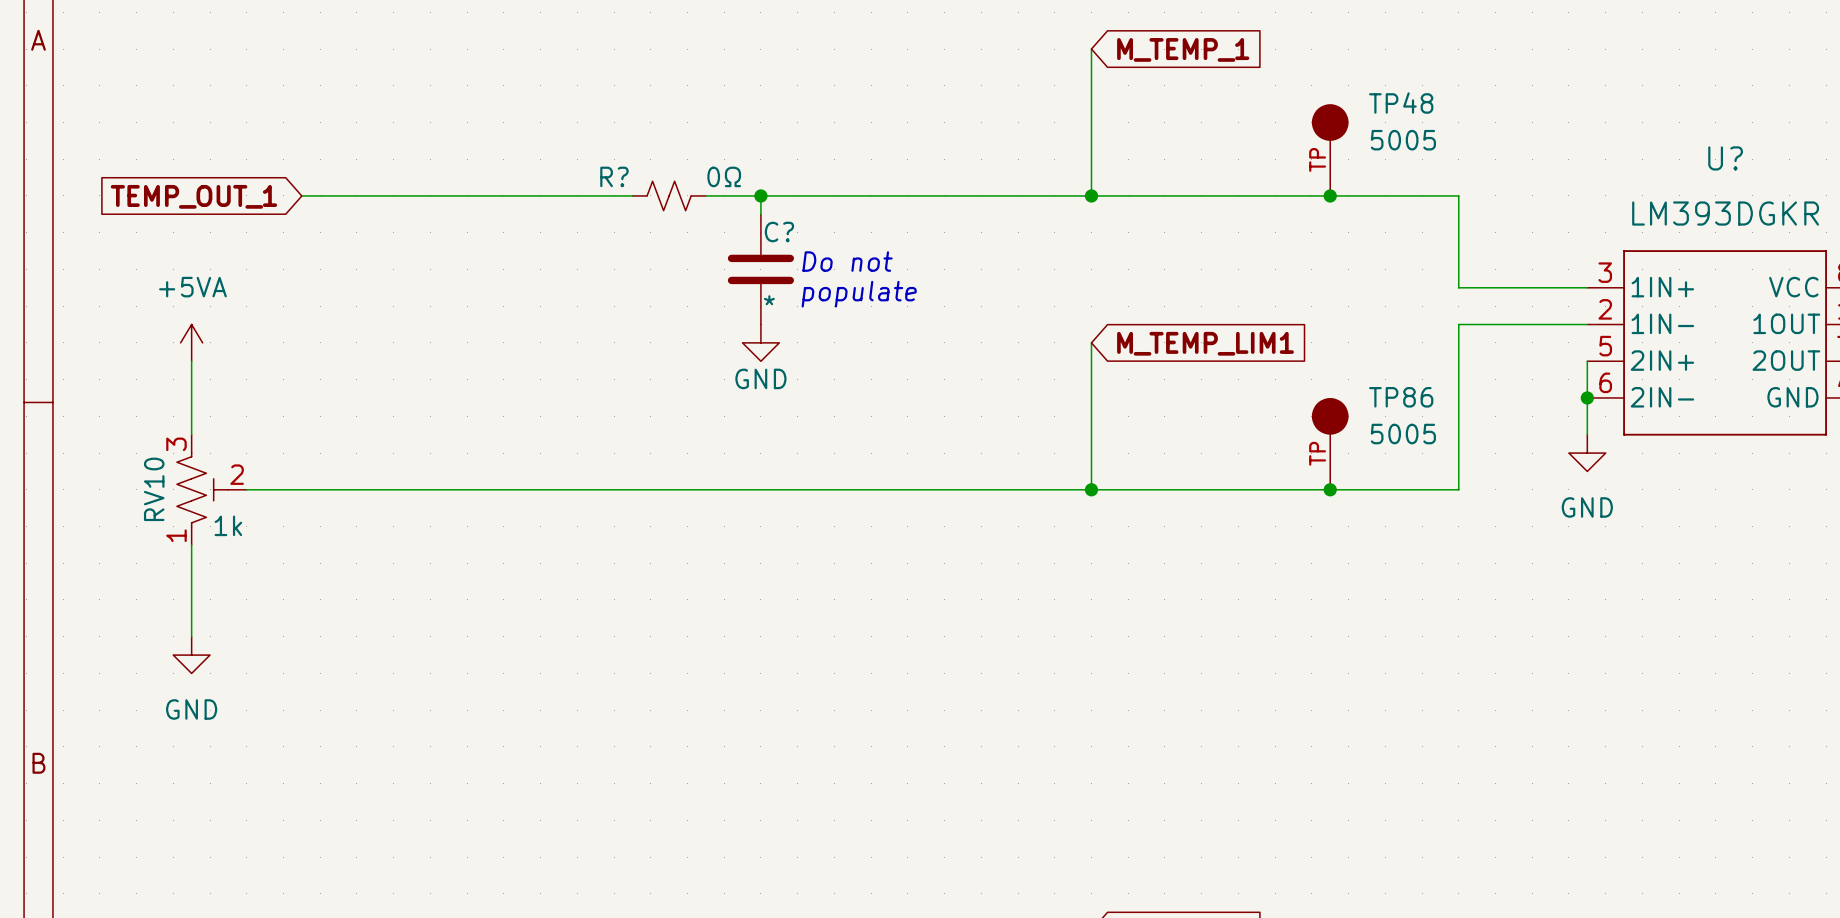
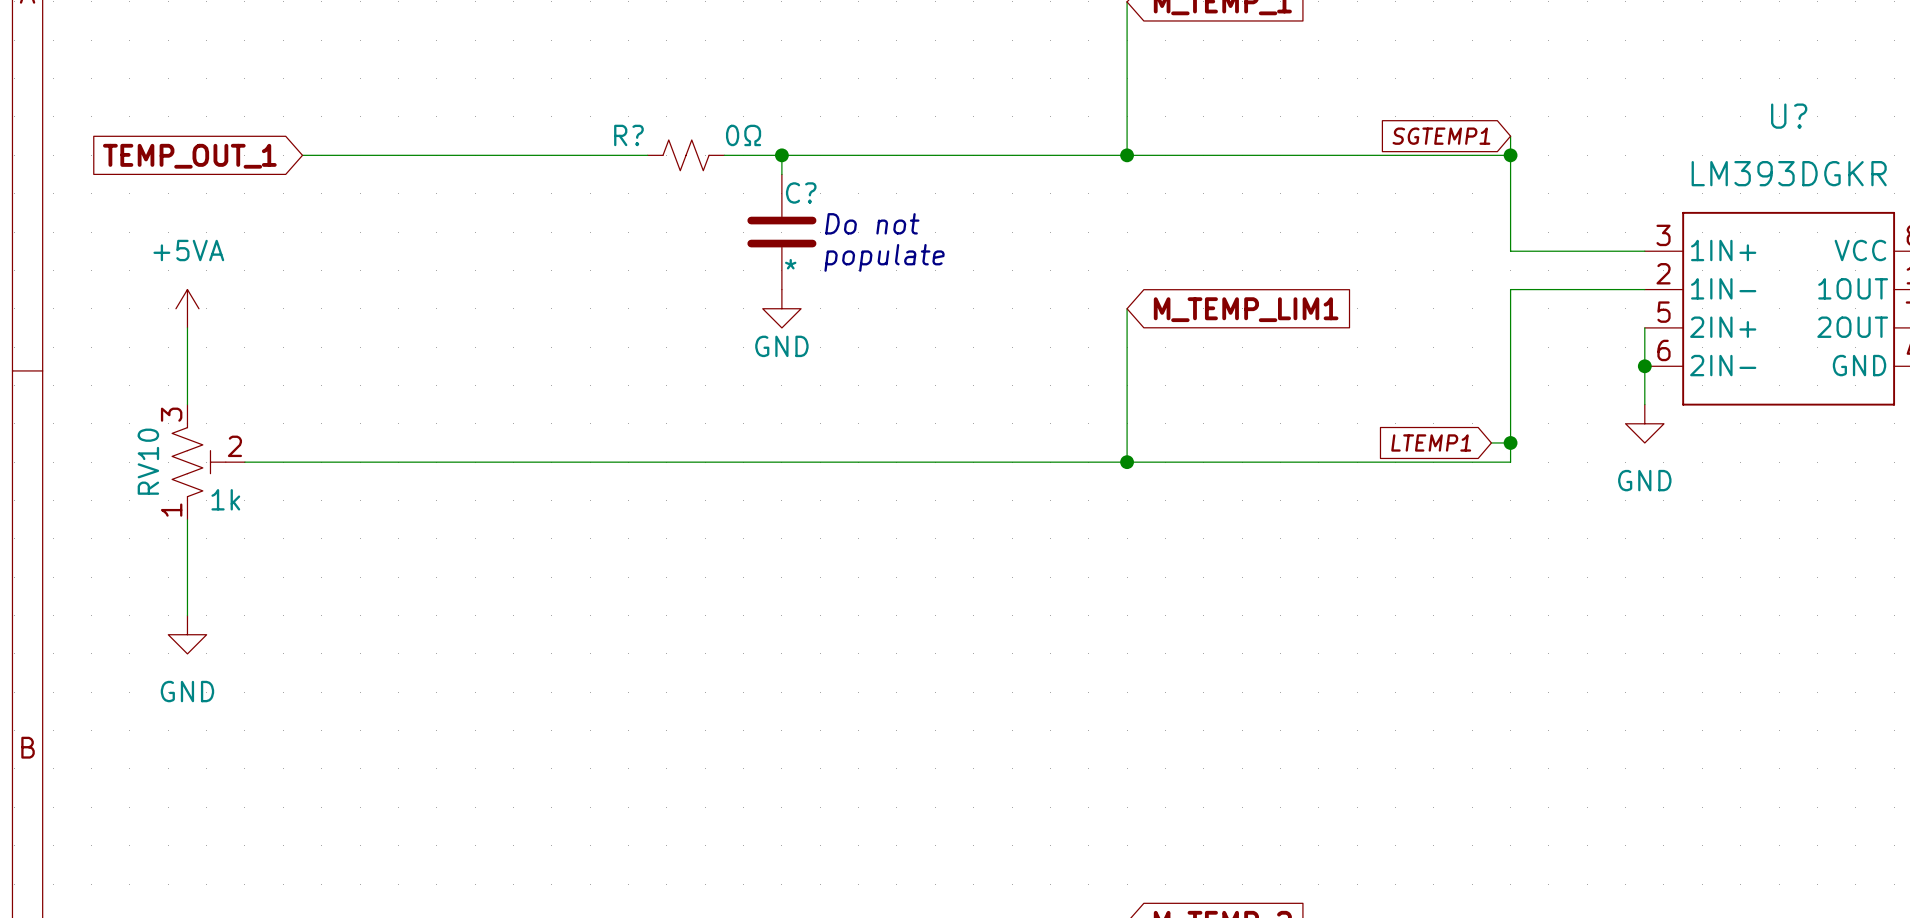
TP48: 5005 (1330, 150) -> none
global label: none -> SGTEMP1 (1441, 136)
wire: none -> (1510, 136) (1510, 155)
junction: (1330, 195) -> none
junction: none -> (1510, 155)
TP86: 5005 (1330, 443) -> none
global label: none -> LTEMP1 (1431, 442)
wire: none -> (1491, 442) (1510, 442)
junction: none -> (1510, 442)
junction: (1330, 489) -> none

